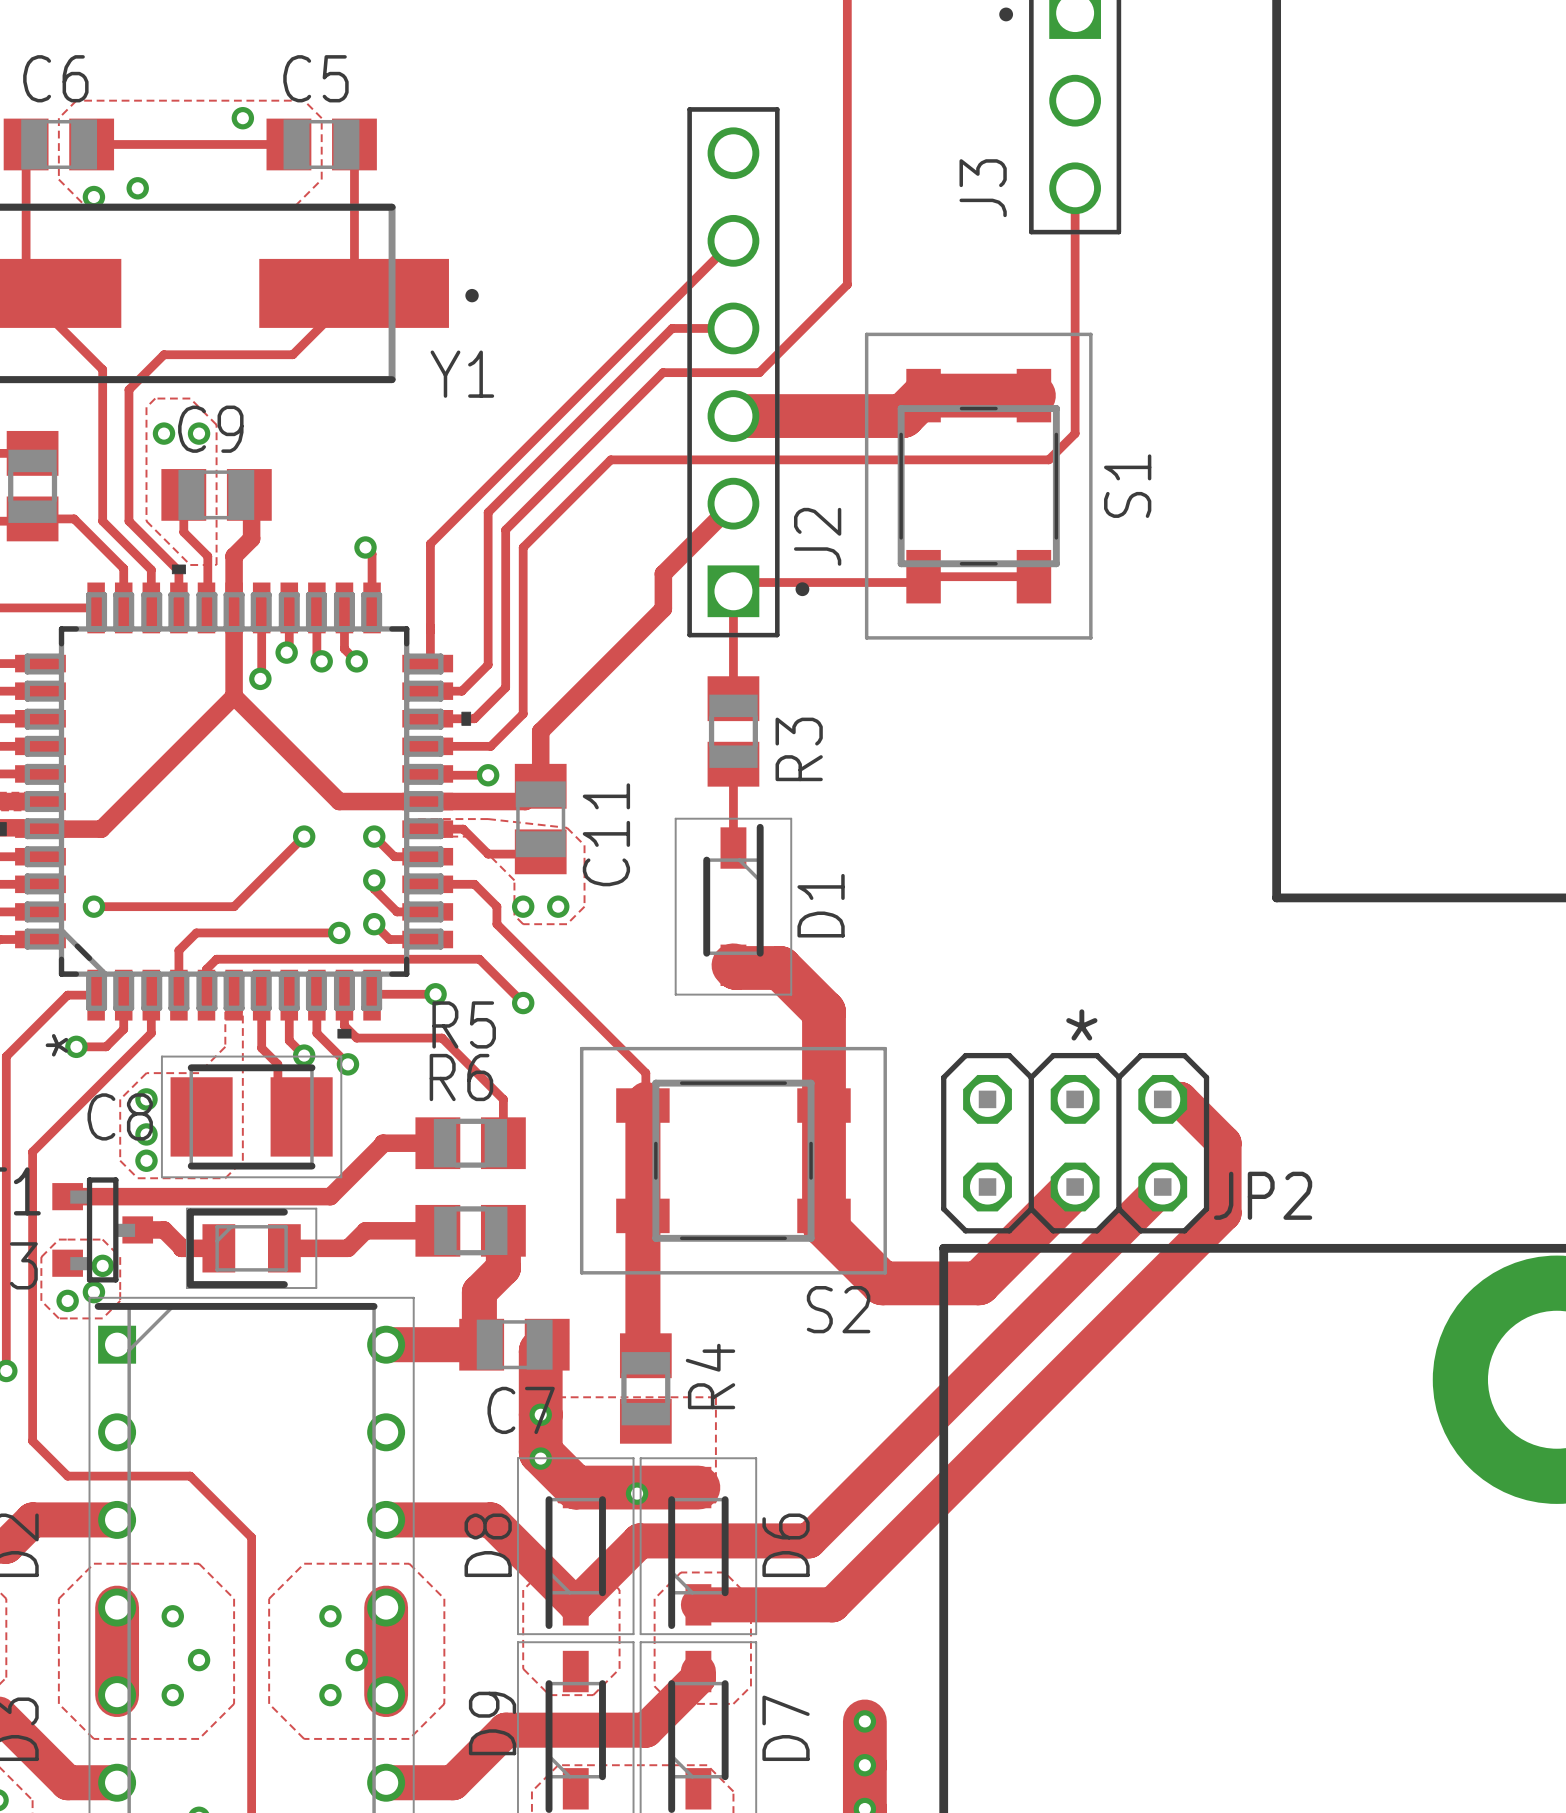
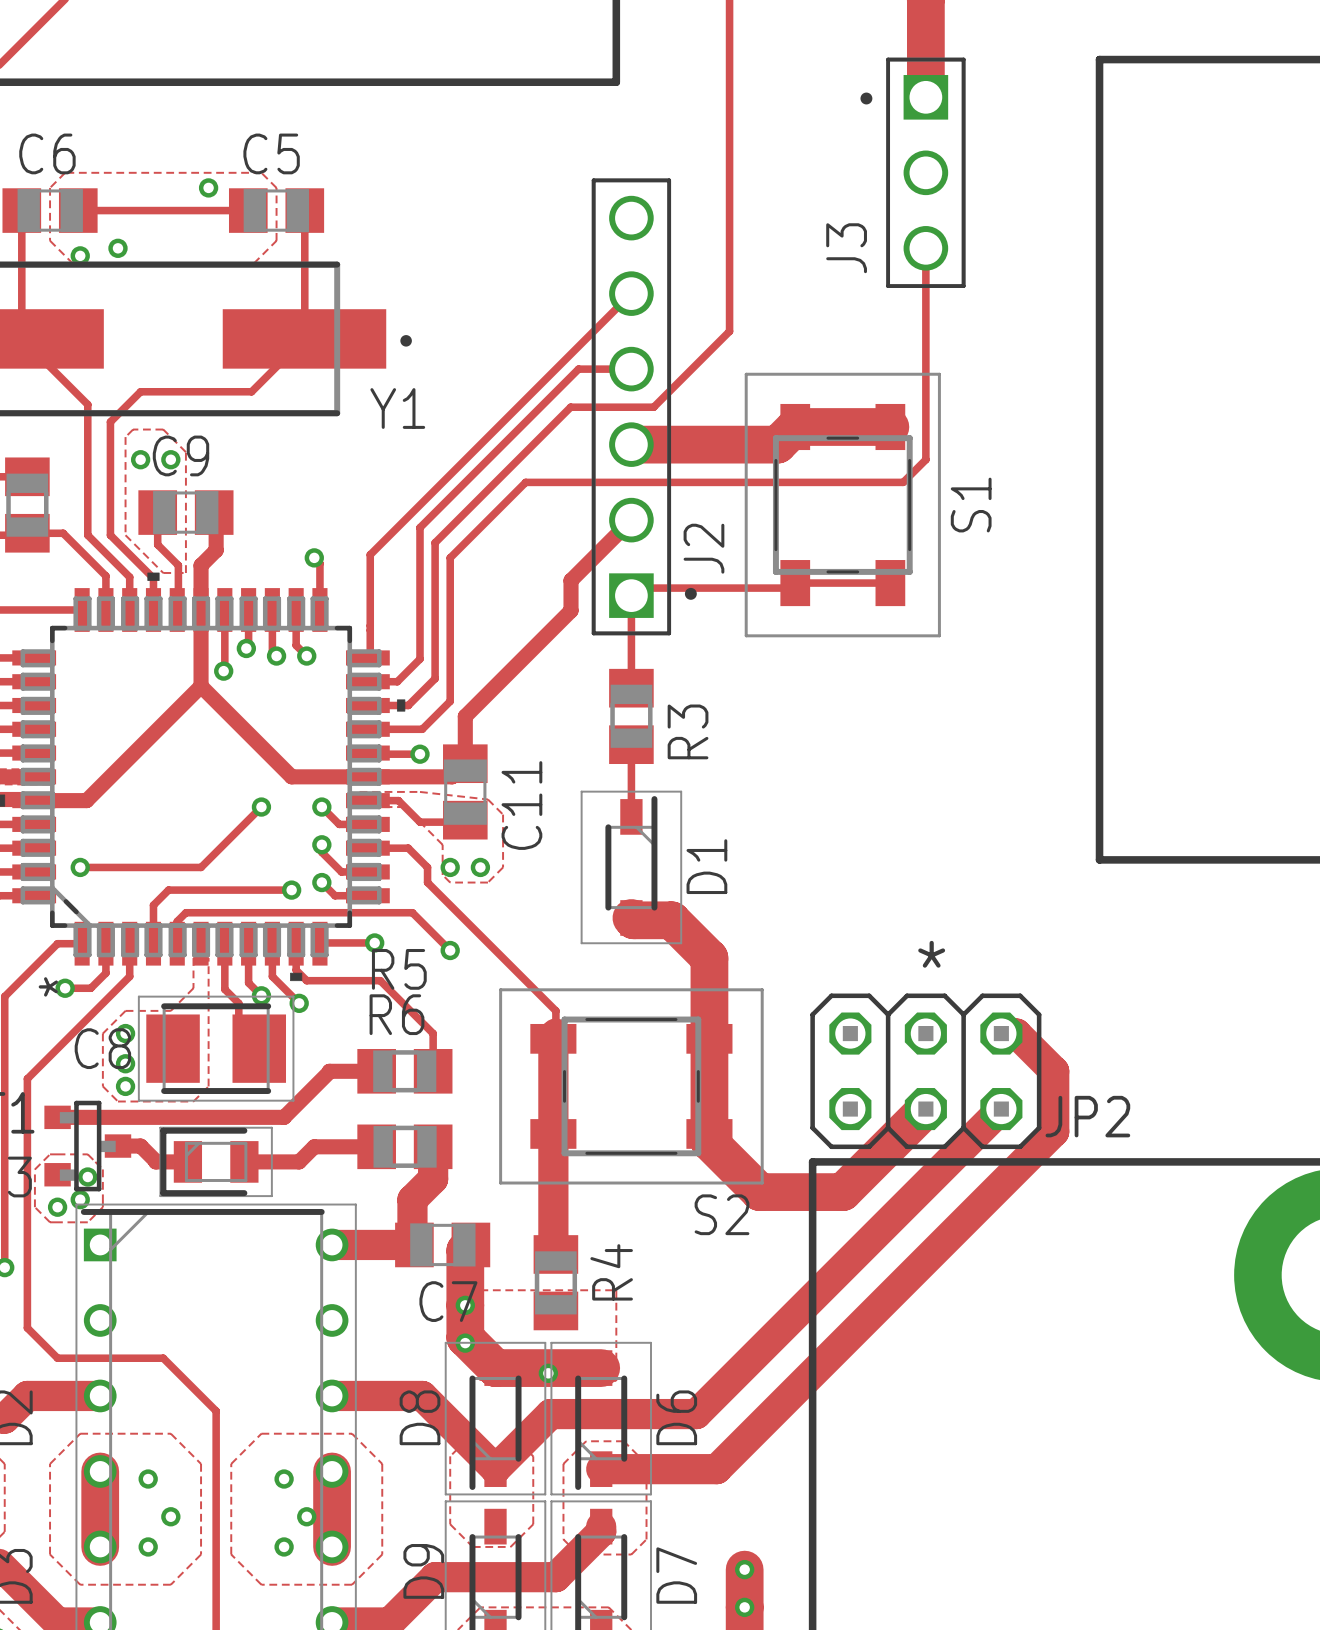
text position: * (1081, 1024) -> * (931, 954)

